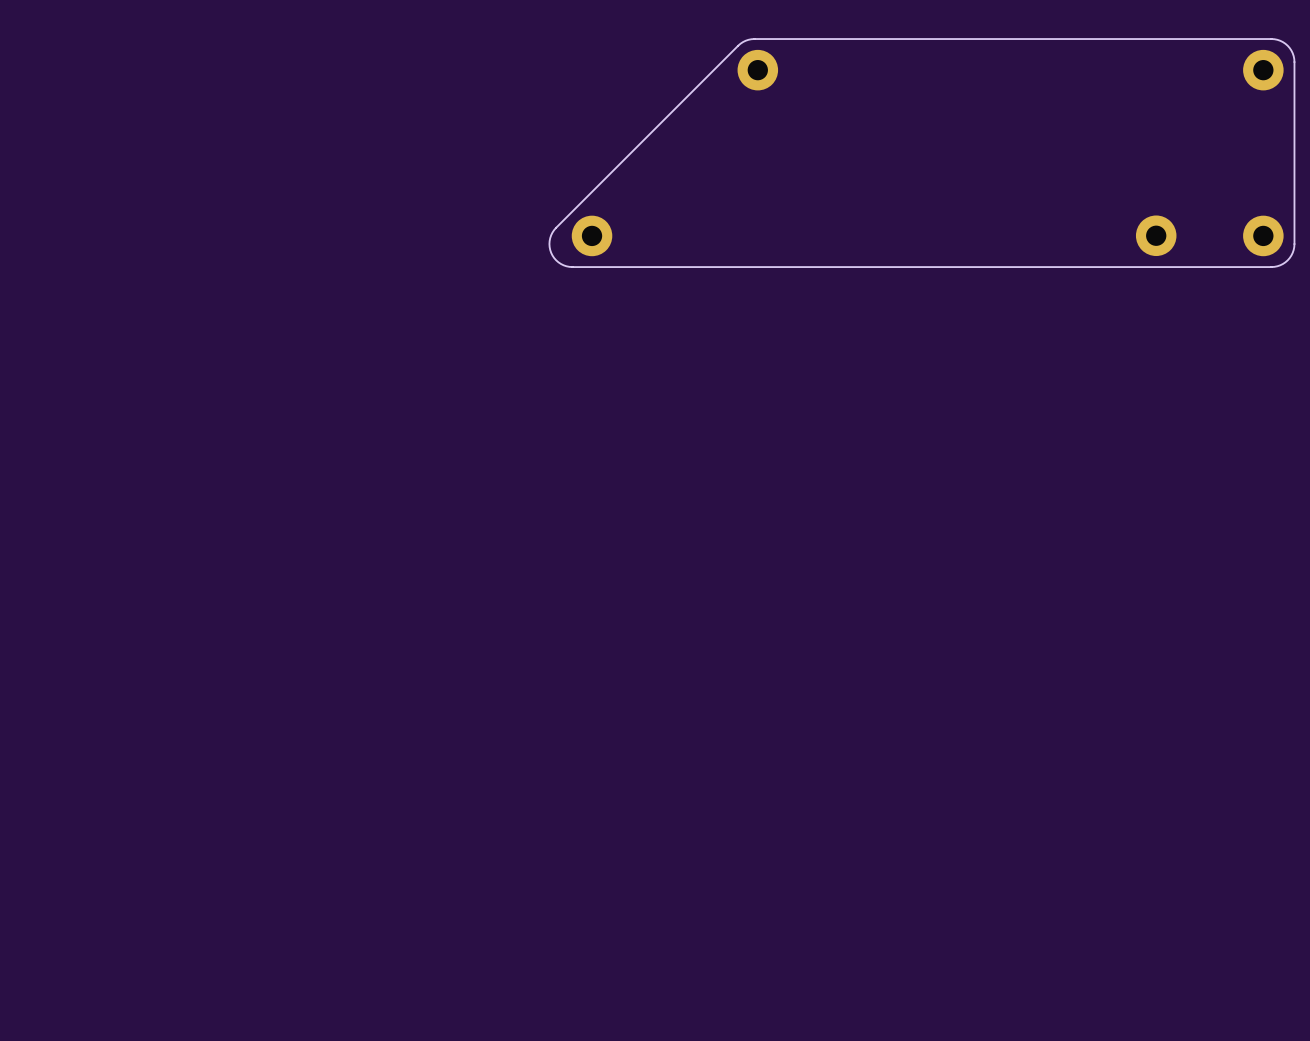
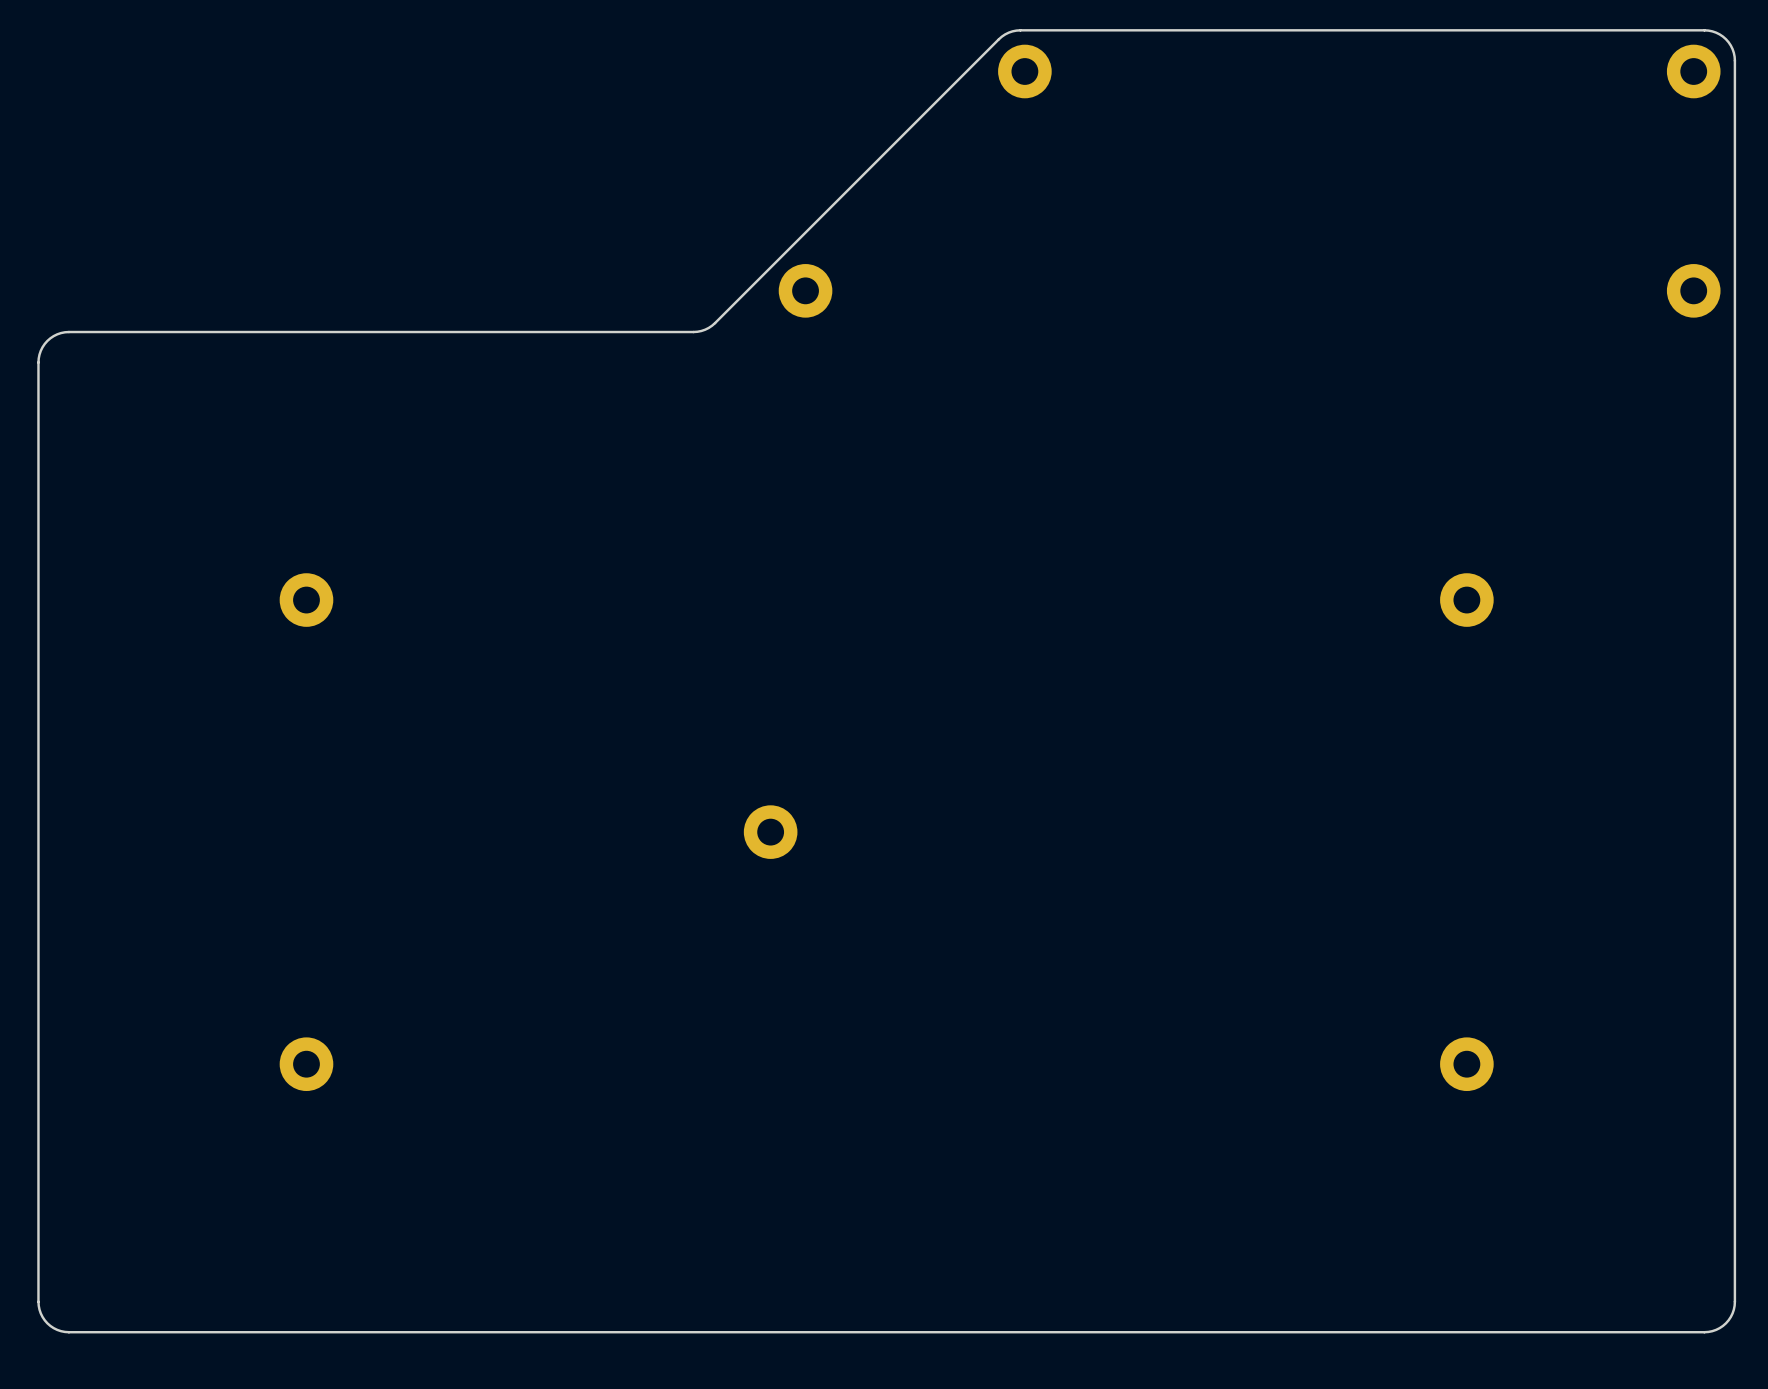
board edge: (1271, 39) (1280, 40) (1287, 45) (1292, 53) (1294, 62) (1294, 247) (1289, 258) (1277, 266) (572, 267) -> (1704, 30) (1716, 32) (1725, 39) (1732, 49) (1734, 60) (1734, 1301) (1732, 1313) (1722, 1325) (1712, 1331) (1704, 1332) (68, 1332) (57, 1329) (50, 1325) (42, 1316) (38, 1301) (38, 362) (39, 354) (44, 343) (57, 334) (68, 332) (697, 331) (712, 325) (758, 280)
board edge: (556, 227) (549, 241) (551, 252) (558, 262) (572, 267) -> none
part: (1156, 235) -> none
part: none -> (306, 600)
part: none -> (1466, 600)
part: none -> (770, 832)
part: none -> (306, 1064)
part: none -> (1466, 1064)

